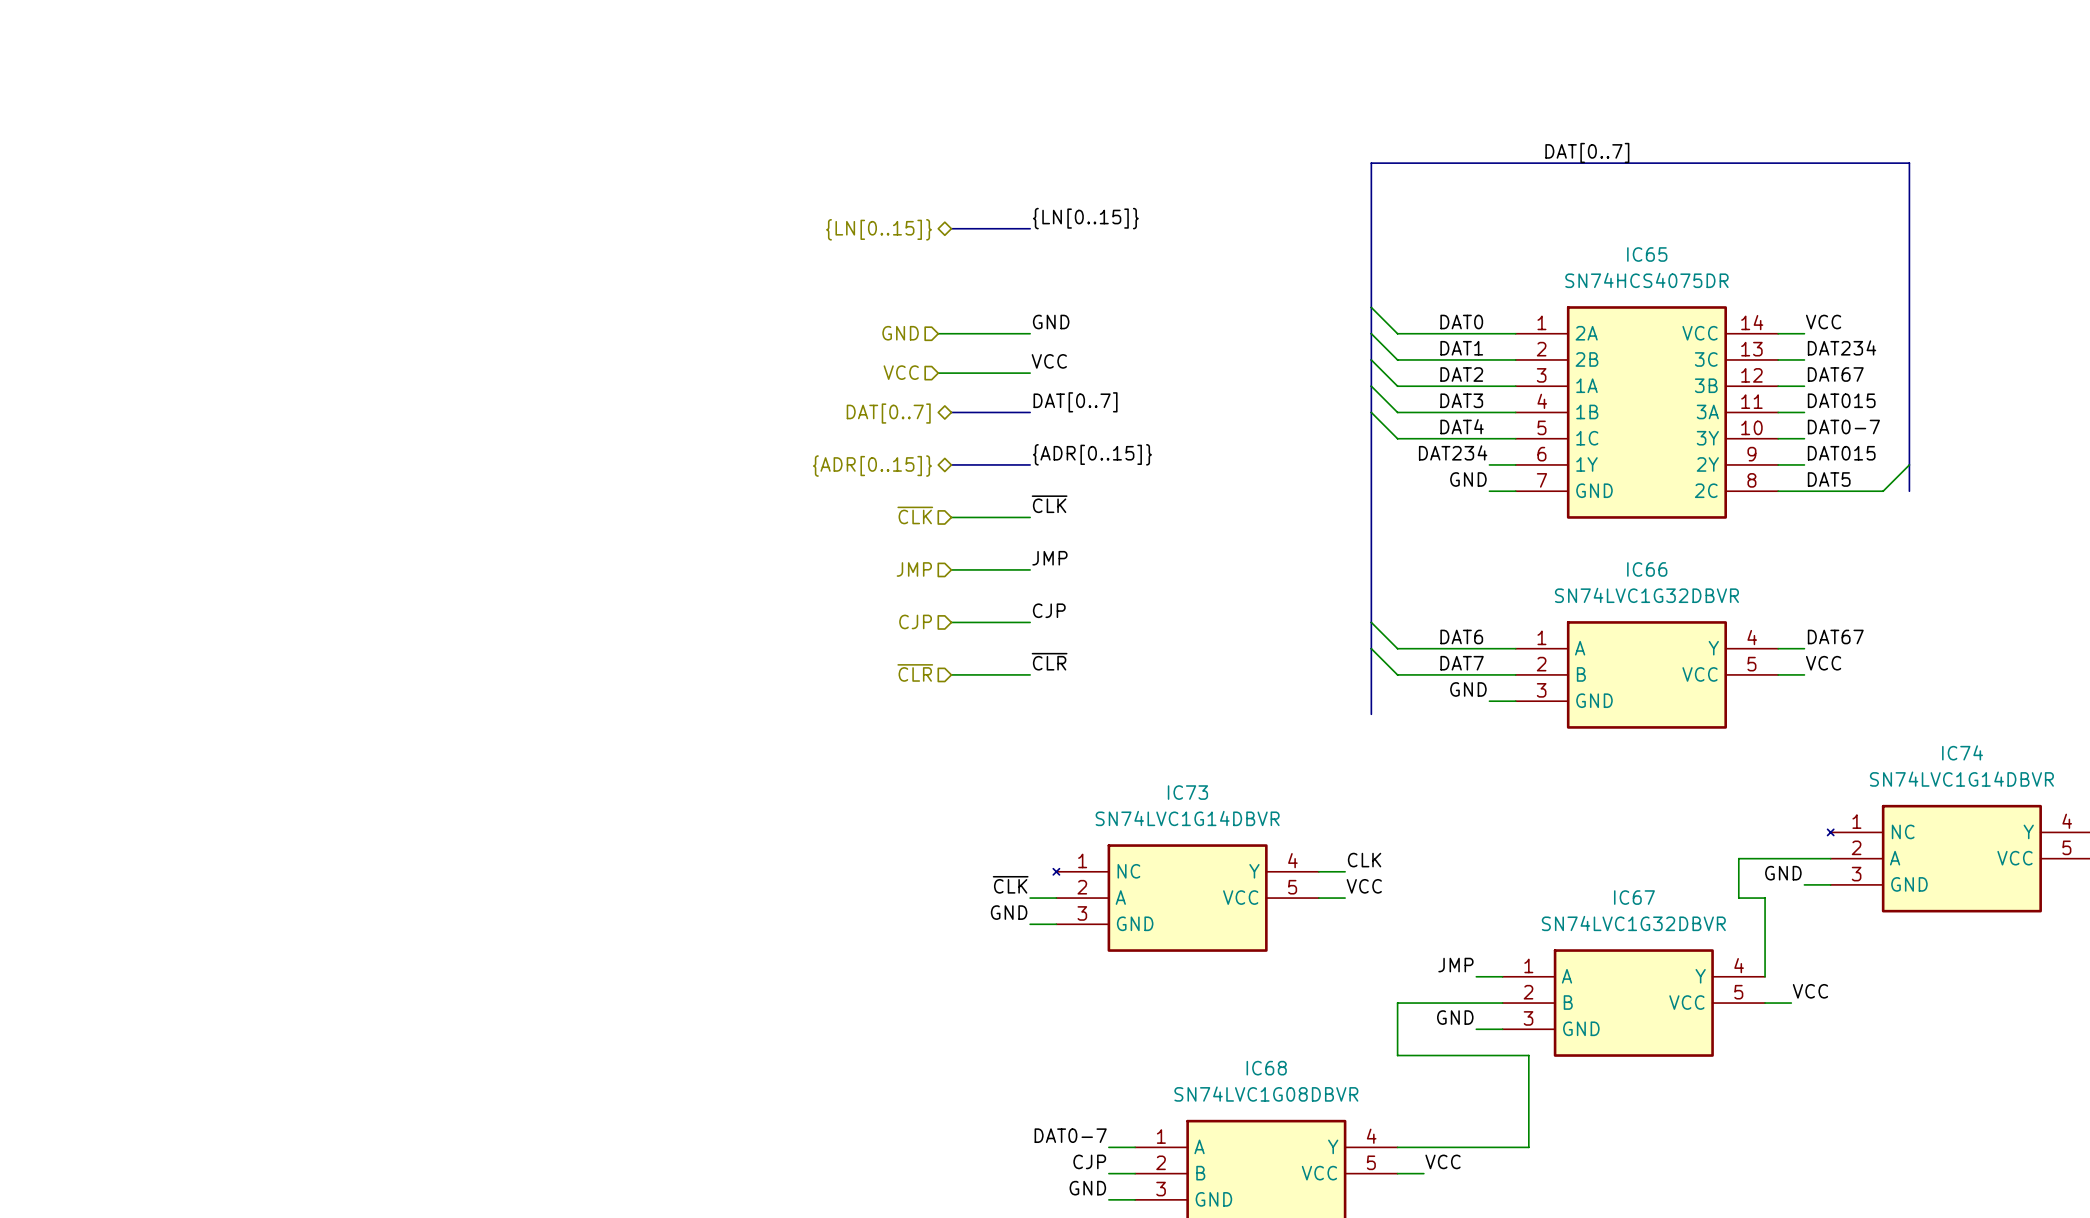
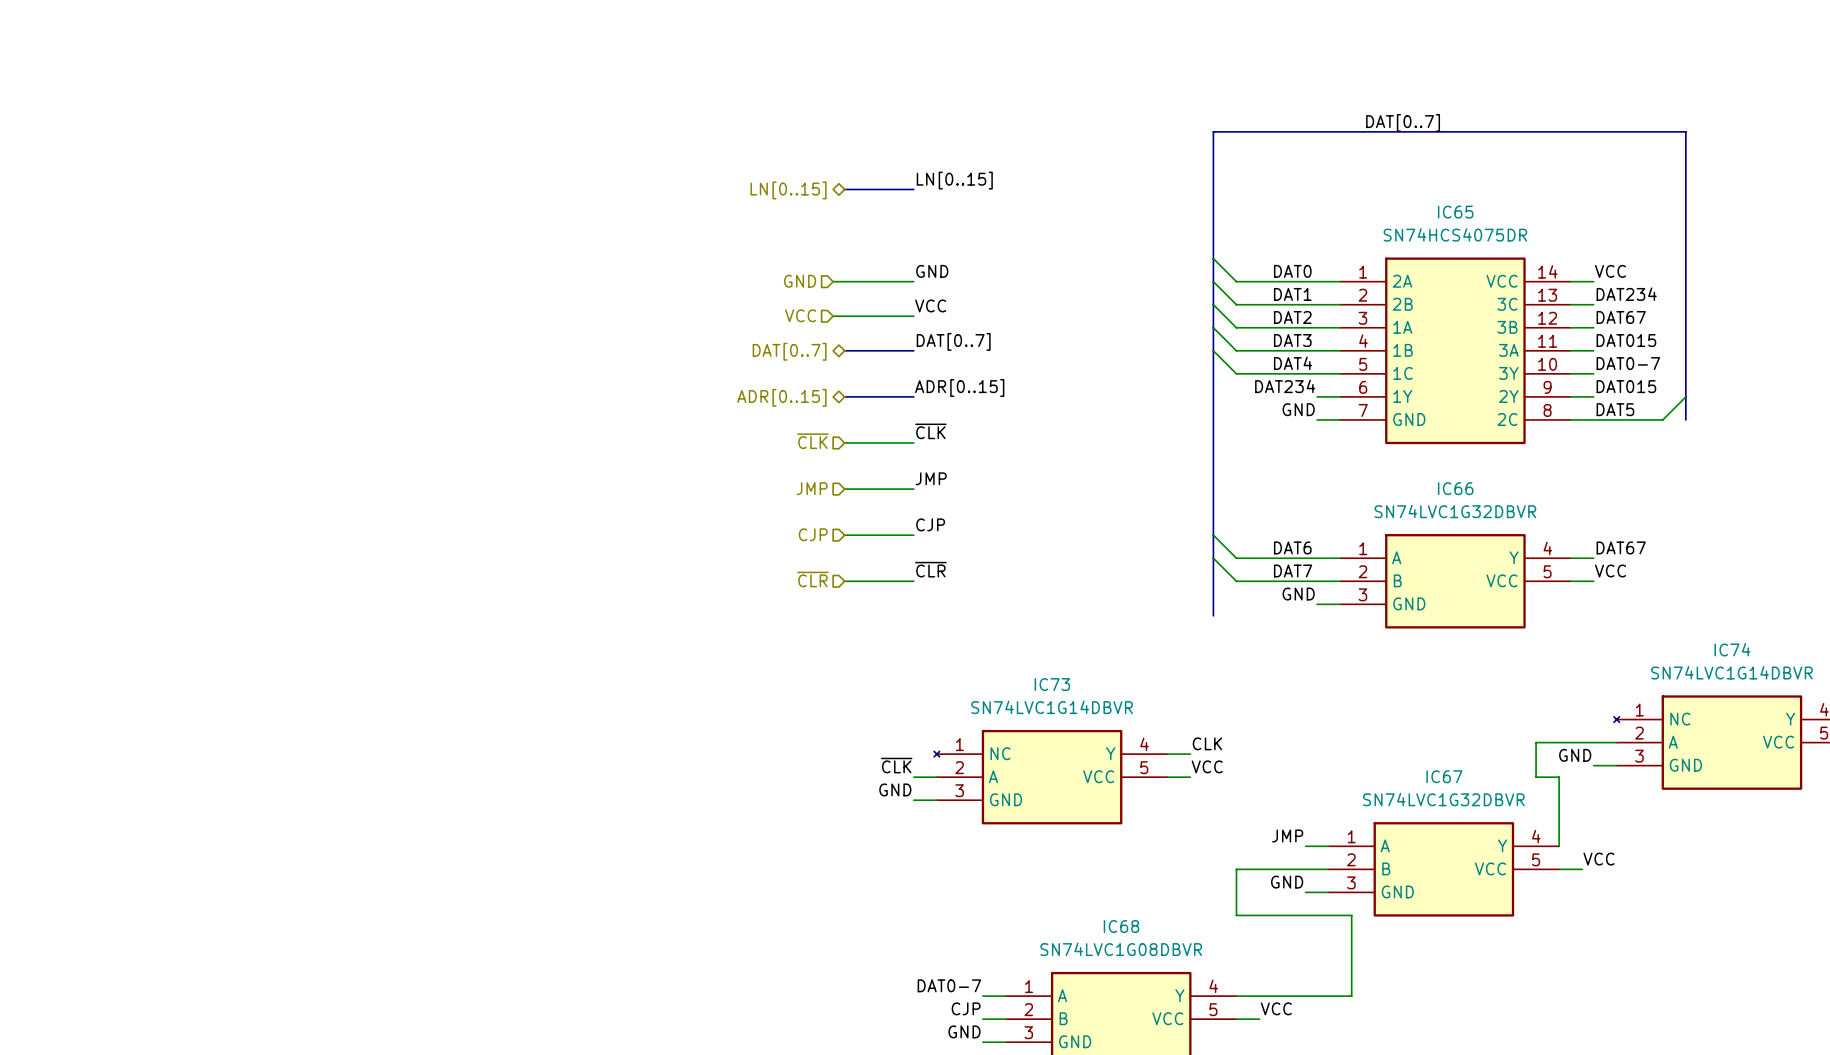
label: {LN[0..15]} (1085, 218) -> LN[0..15] (954, 180)
hierarchical label: {LN[0..15]} (879, 229) -> LN[0..15] (788, 190)
label: {ADR[0..15]} (1092, 454) -> ADR[0..15] (959, 387)
hierarchical label: {ADR[0..15]} (872, 466) -> ADR[0..15] (781, 397)

